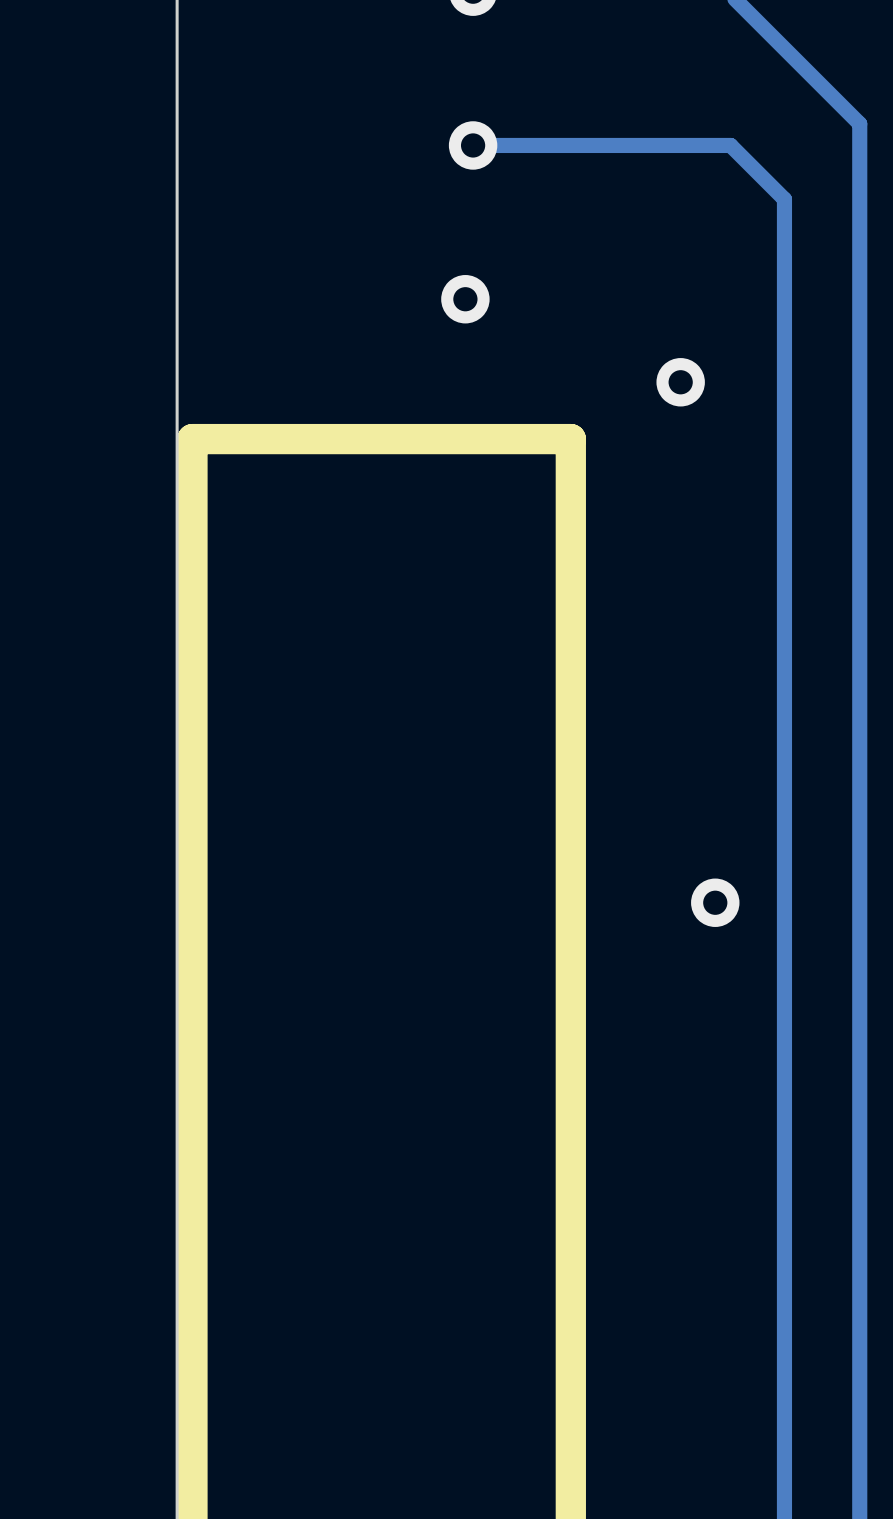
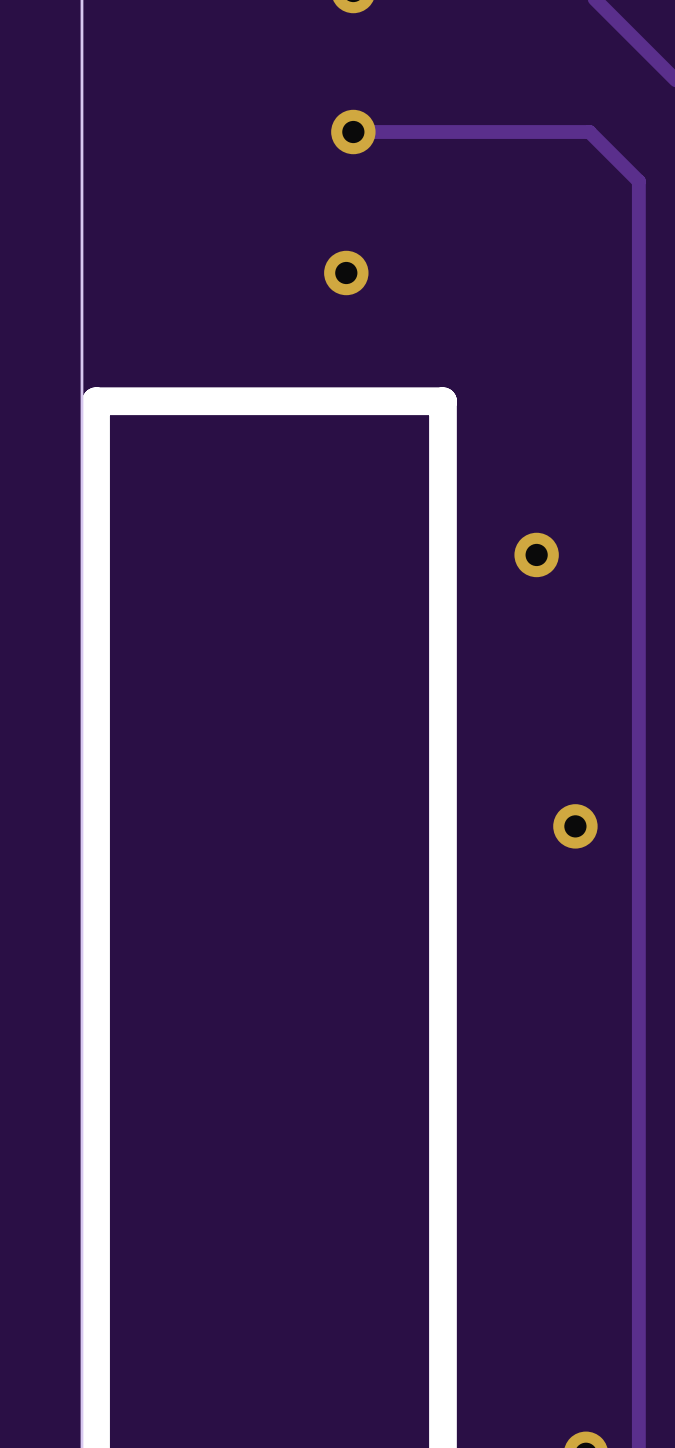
via: (680, 382) -> none
via: none -> (536, 554)

